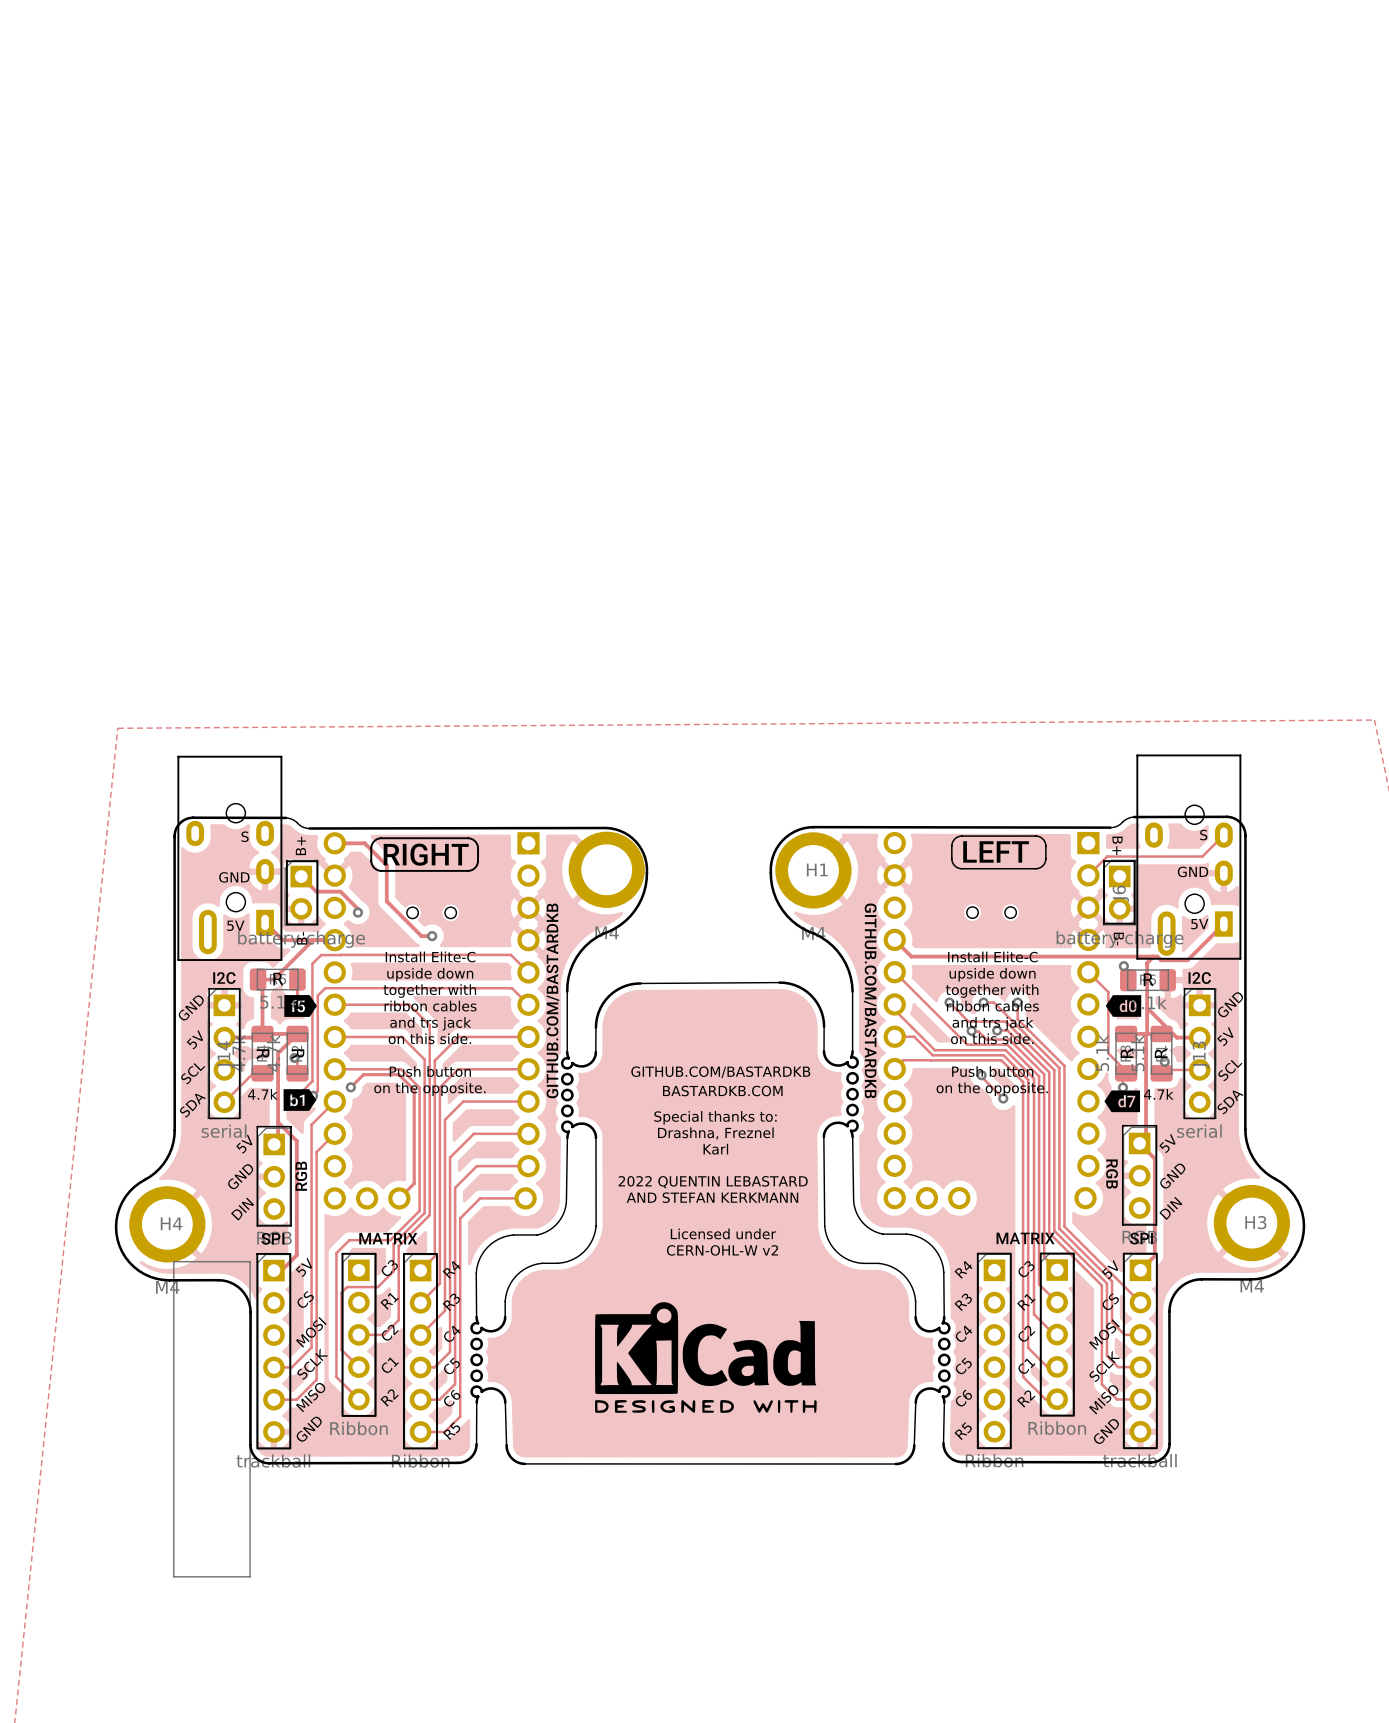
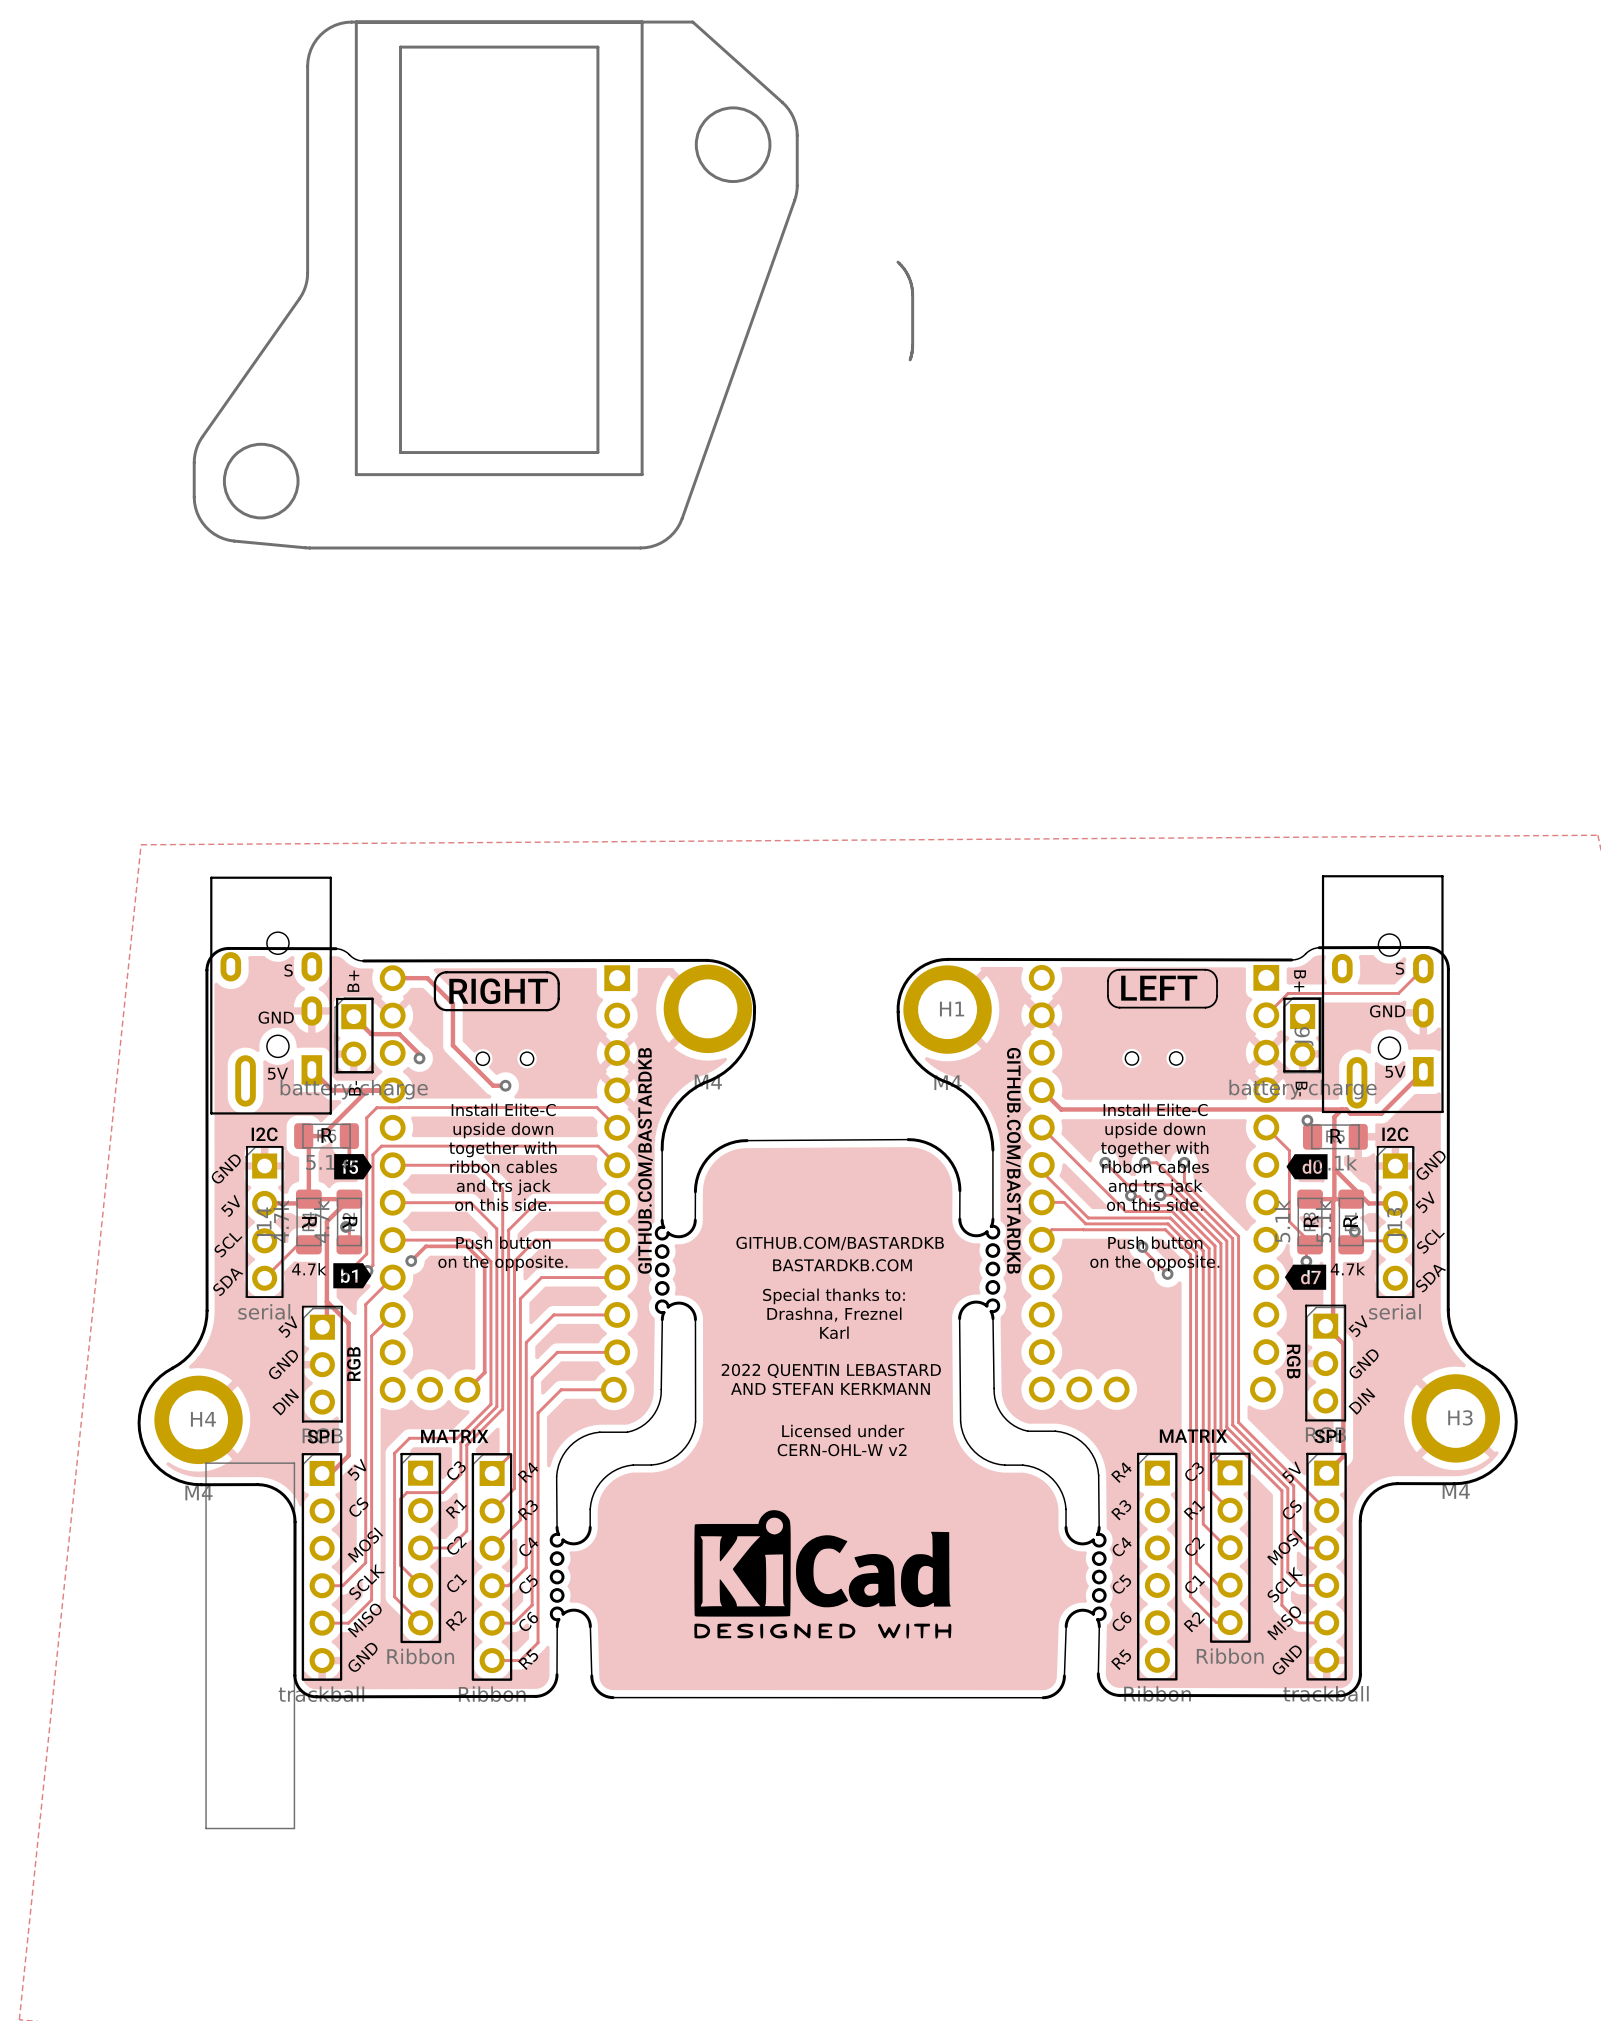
line: none -> (351, 22) (692, 22) (782, 102) (791, 113) (796, 130) (795, 196) (682, 518) (674, 532) (661, 542) (640, 548) (307, 547) (228, 540) (209, 530) (199, 517) (194, 497) (194, 458) (197, 445) (299, 298) (305, 286) (307, 273) (308, 60) (313, 44) (324, 31) (340, 23) (351, 22)
line: none -> (356, 22) (356, 474) (642, 474) (642, 22)
line: none -> (400, 47) (597, 47) (597, 452) (400, 452) (400, 47)
drawing: none -> [694, 106, 772, 184]
line: none -> (897, 262) (907, 274) (912, 290) (912, 347) (910, 359)
drawing: none -> [222, 442, 300, 520]

